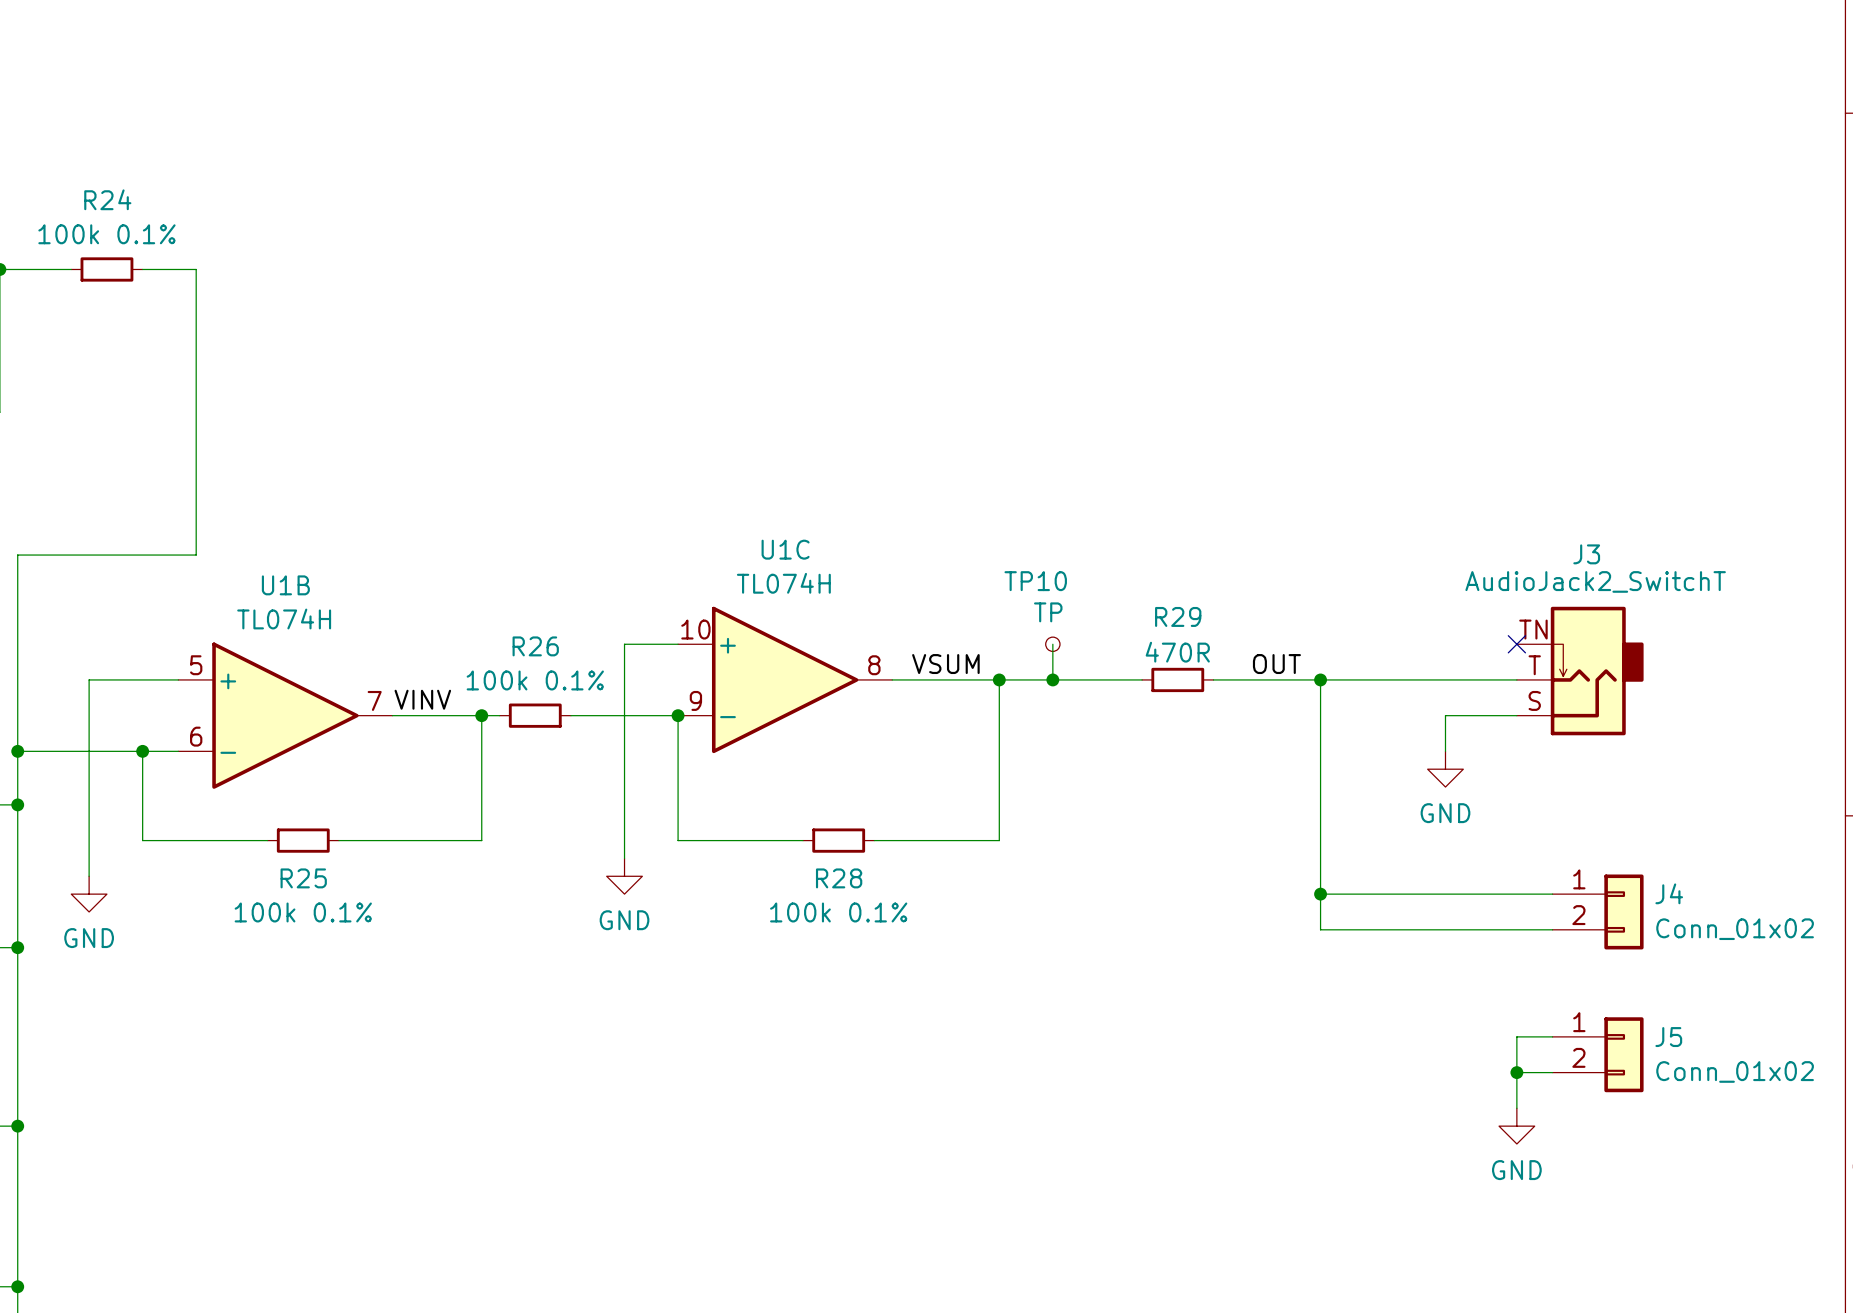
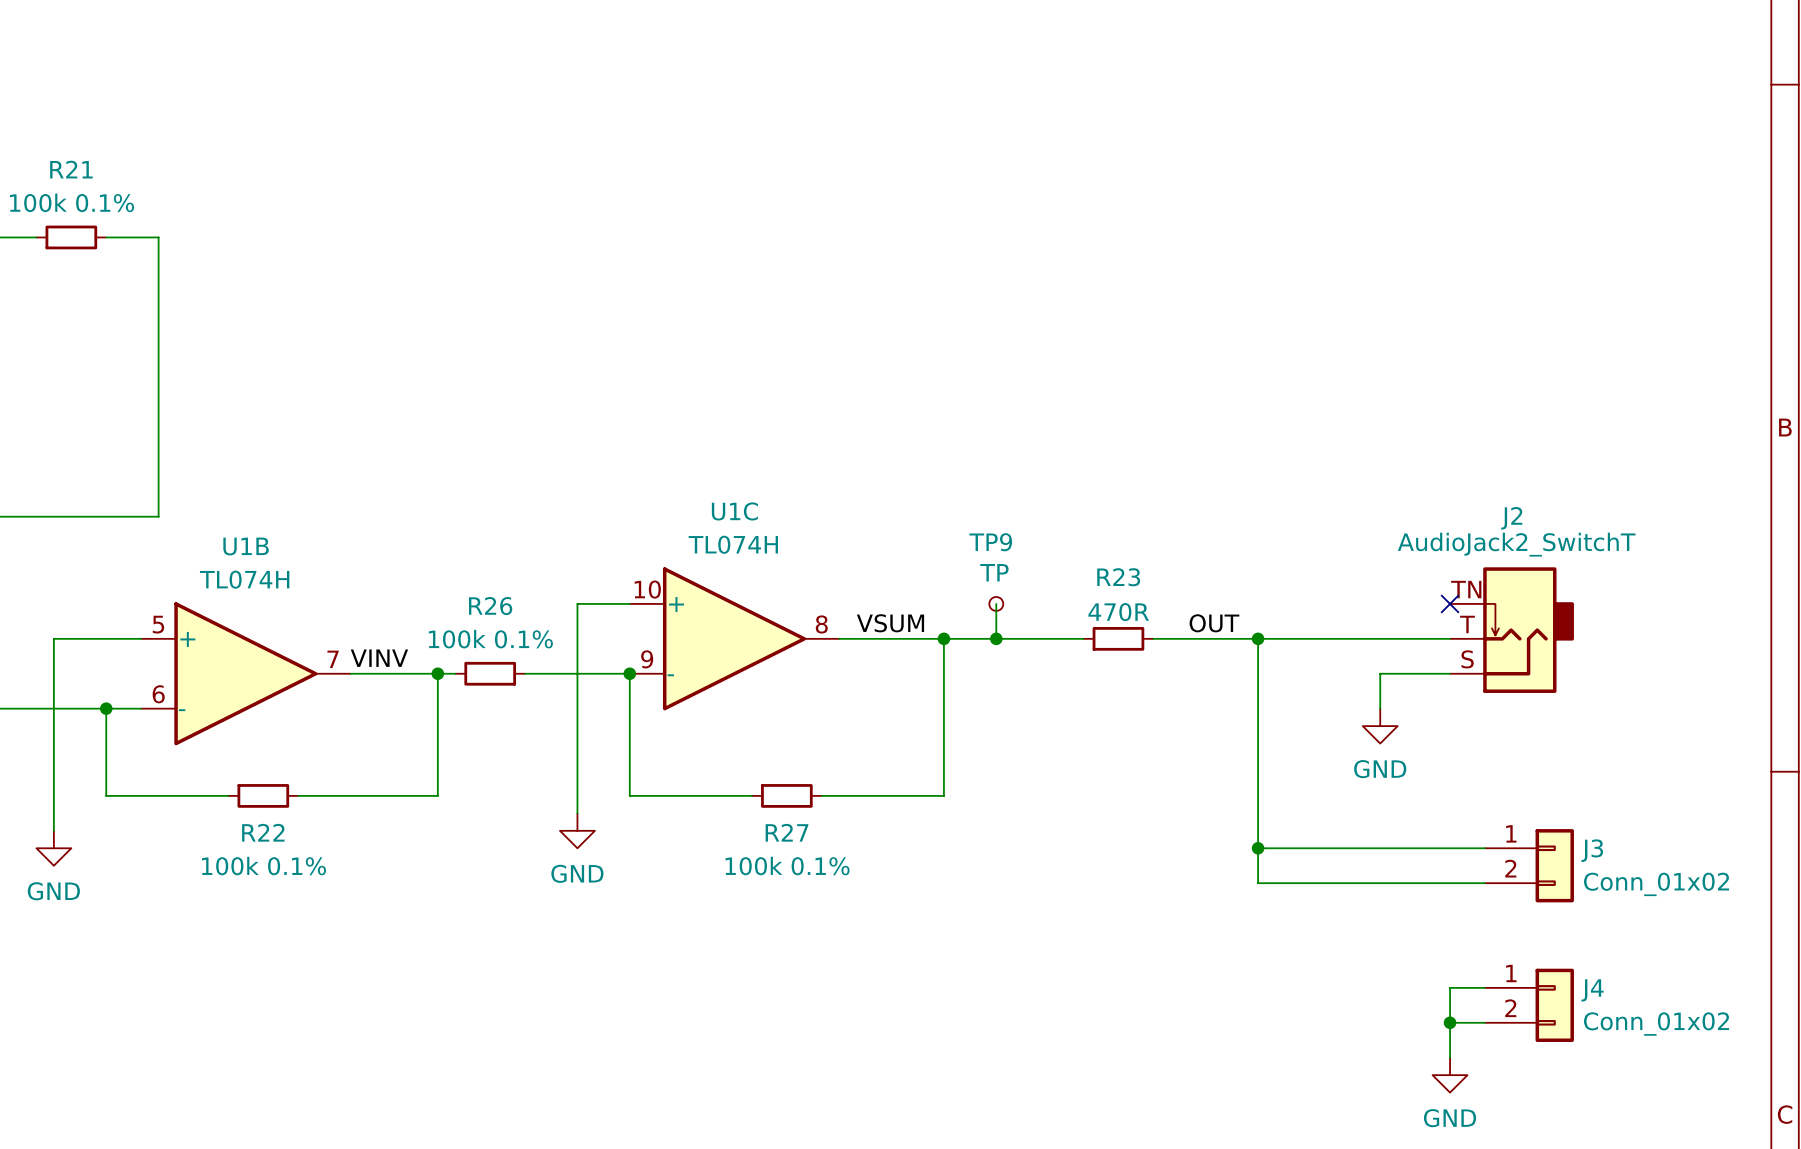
R24 name: R24 (107, 199) -> R21 (71, 169)
J3 name: J3 (1586, 554) -> J2 (1511, 518)
TP10 name: TP10 (1035, 581) -> TP9 (990, 542)
R29 name: R29 (1178, 616) -> R23 (1118, 577)
R25 name: R25 (303, 878) -> R22 (263, 832)
R28 name: R28 (839, 878) -> R27 (787, 832)
J4 name: J4 (1669, 893) -> J3 (1592, 850)
J5 name: J5 (1668, 1037) -> J4 (1592, 990)

